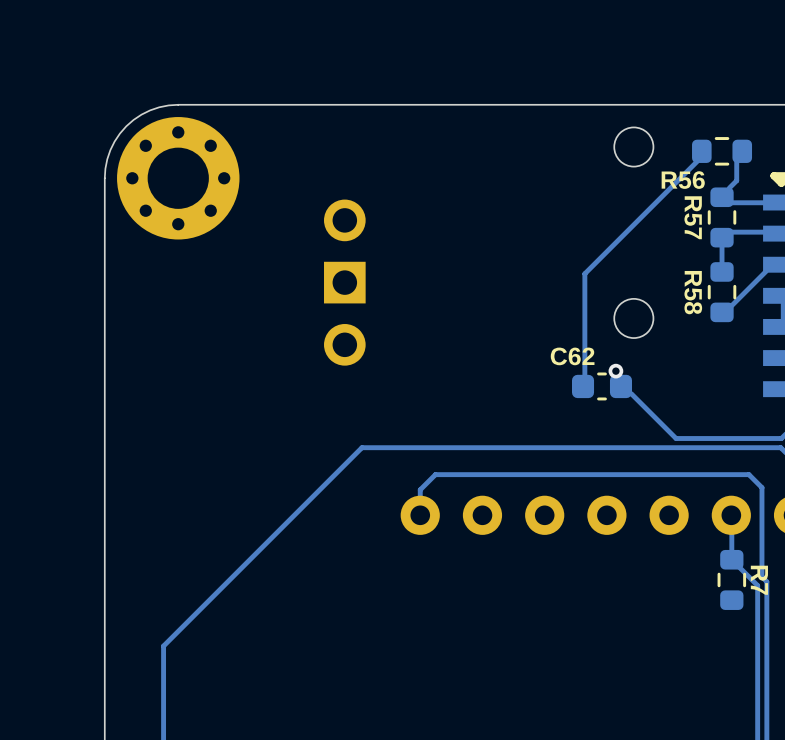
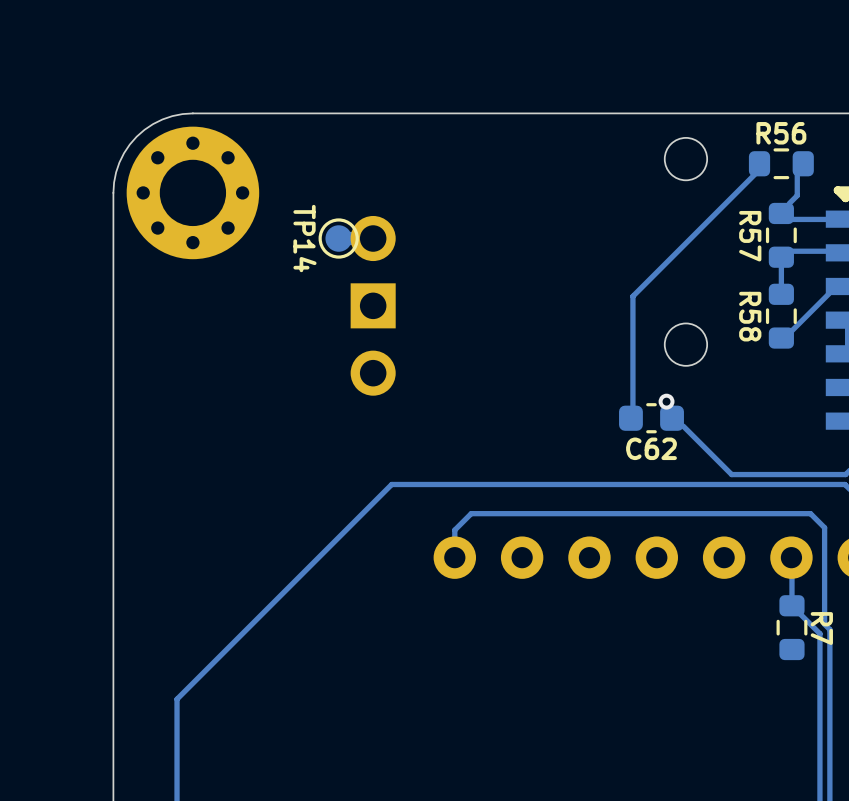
R56 name position: R56 (683, 180) -> R56 (781, 133)
TP14: none -> (338, 238)
C62 name position: C62 (572, 356) -> C62 (651, 448)

